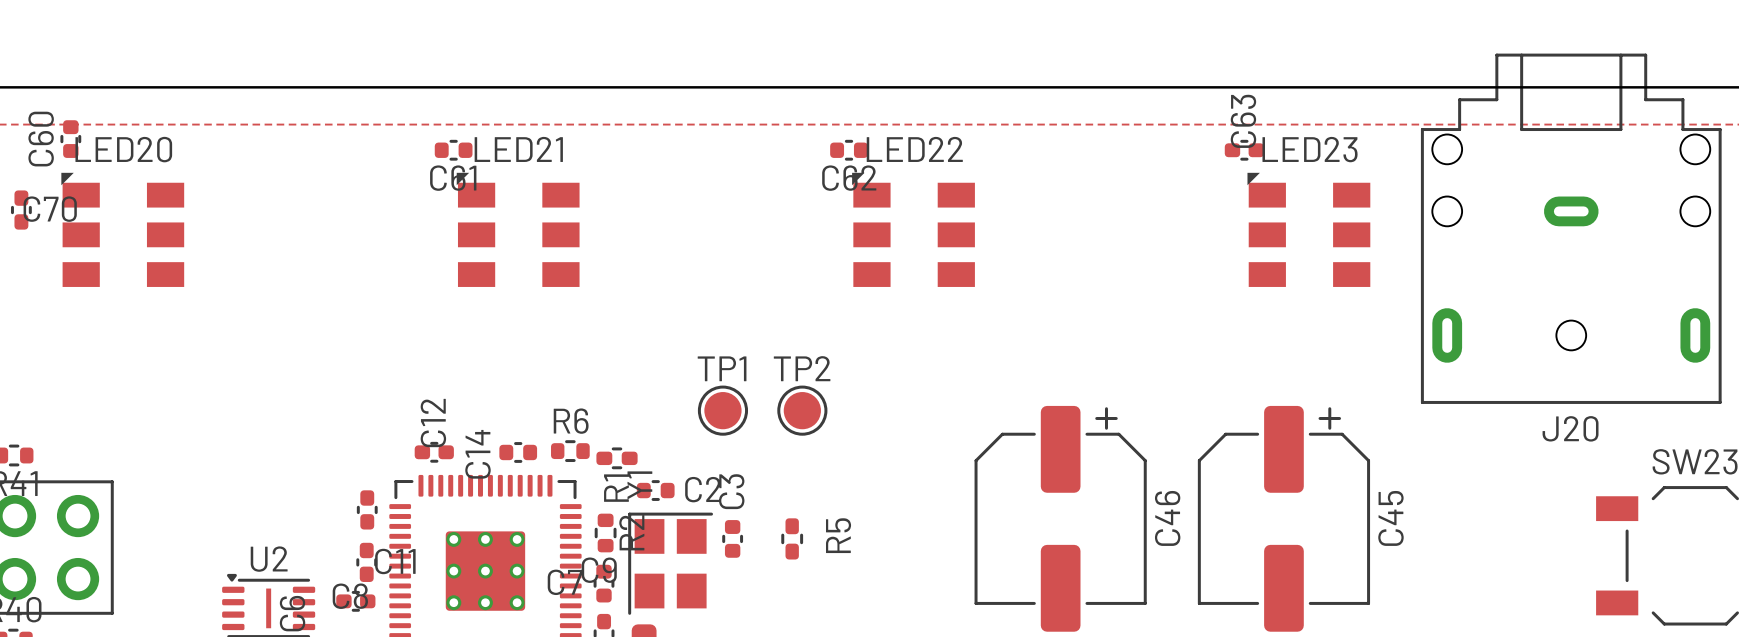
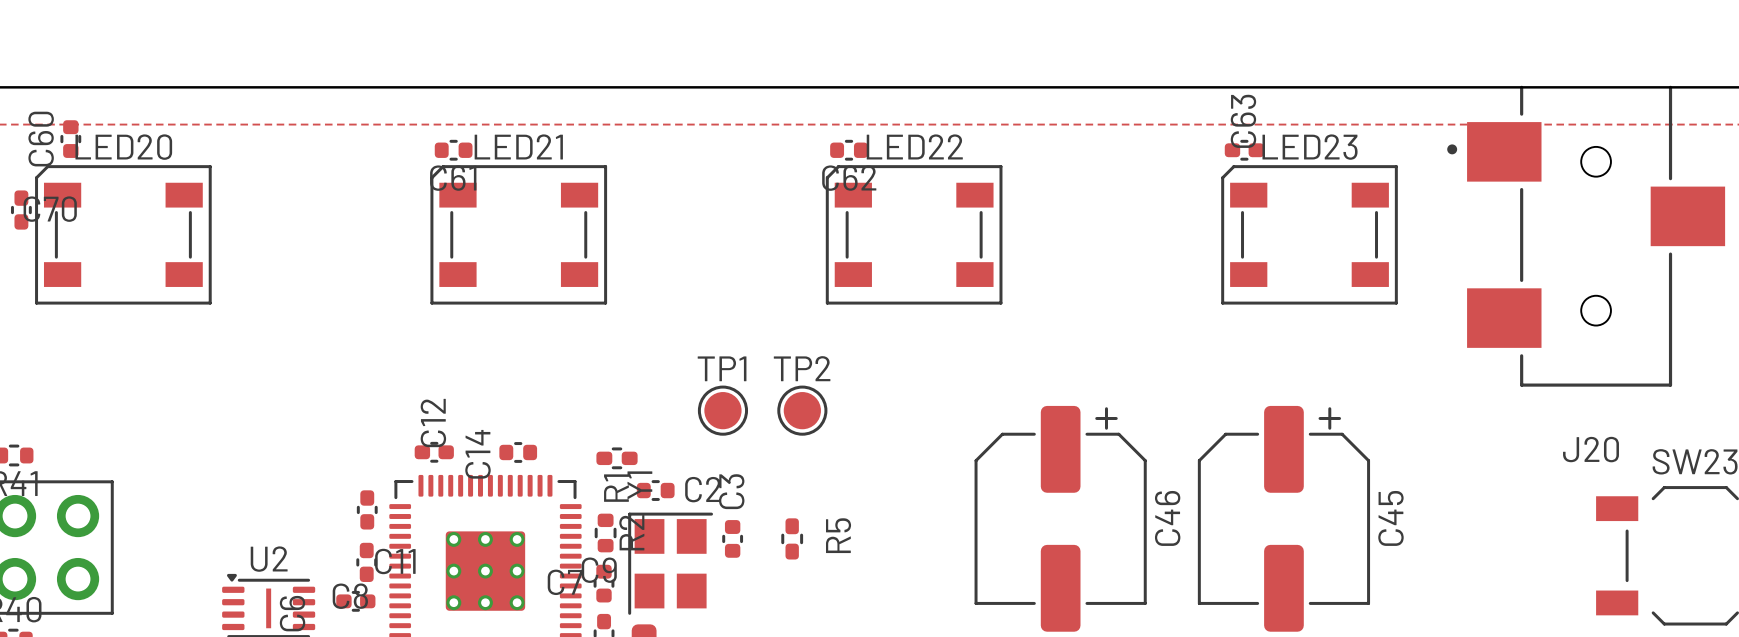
J20 footprint: [1420, 53, 1722, 404] -> [1447, 85, 1726, 387]
LED20 footprint: [61, 172, 185, 287] -> [35, 165, 212, 305]
LED21 footprint: [456, 172, 580, 287] -> [430, 165, 608, 305]
LED22 footprint: [852, 172, 975, 287] -> [825, 165, 1003, 305]
LED23 footprint: [1247, 172, 1371, 287] -> [1221, 165, 1398, 305]
R6: (570, 451) -> none

